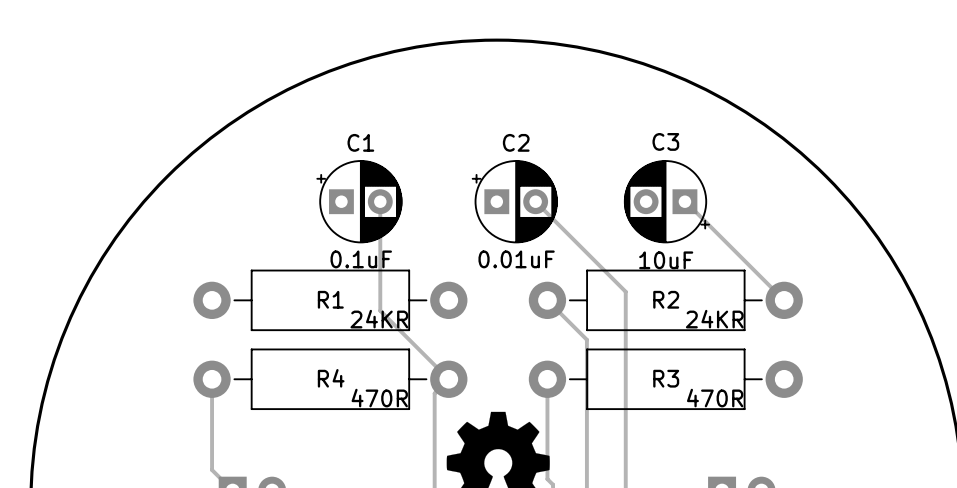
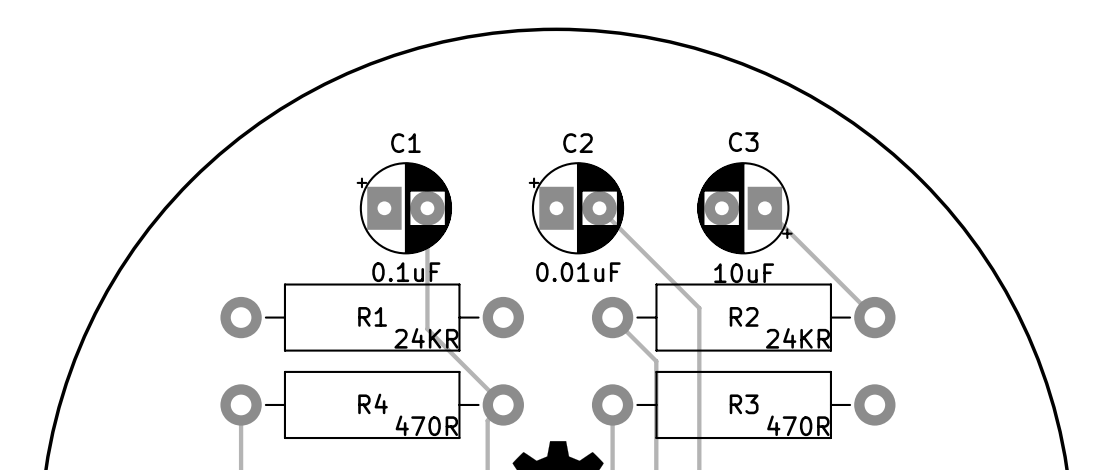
C1 footprint: [316, 160, 403, 244] -> [356, 162, 453, 255]
C2 footprint: [471, 160, 558, 244] -> [528, 162, 625, 255]
C3 footprint: [623, 160, 711, 244] -> [697, 162, 793, 255]

